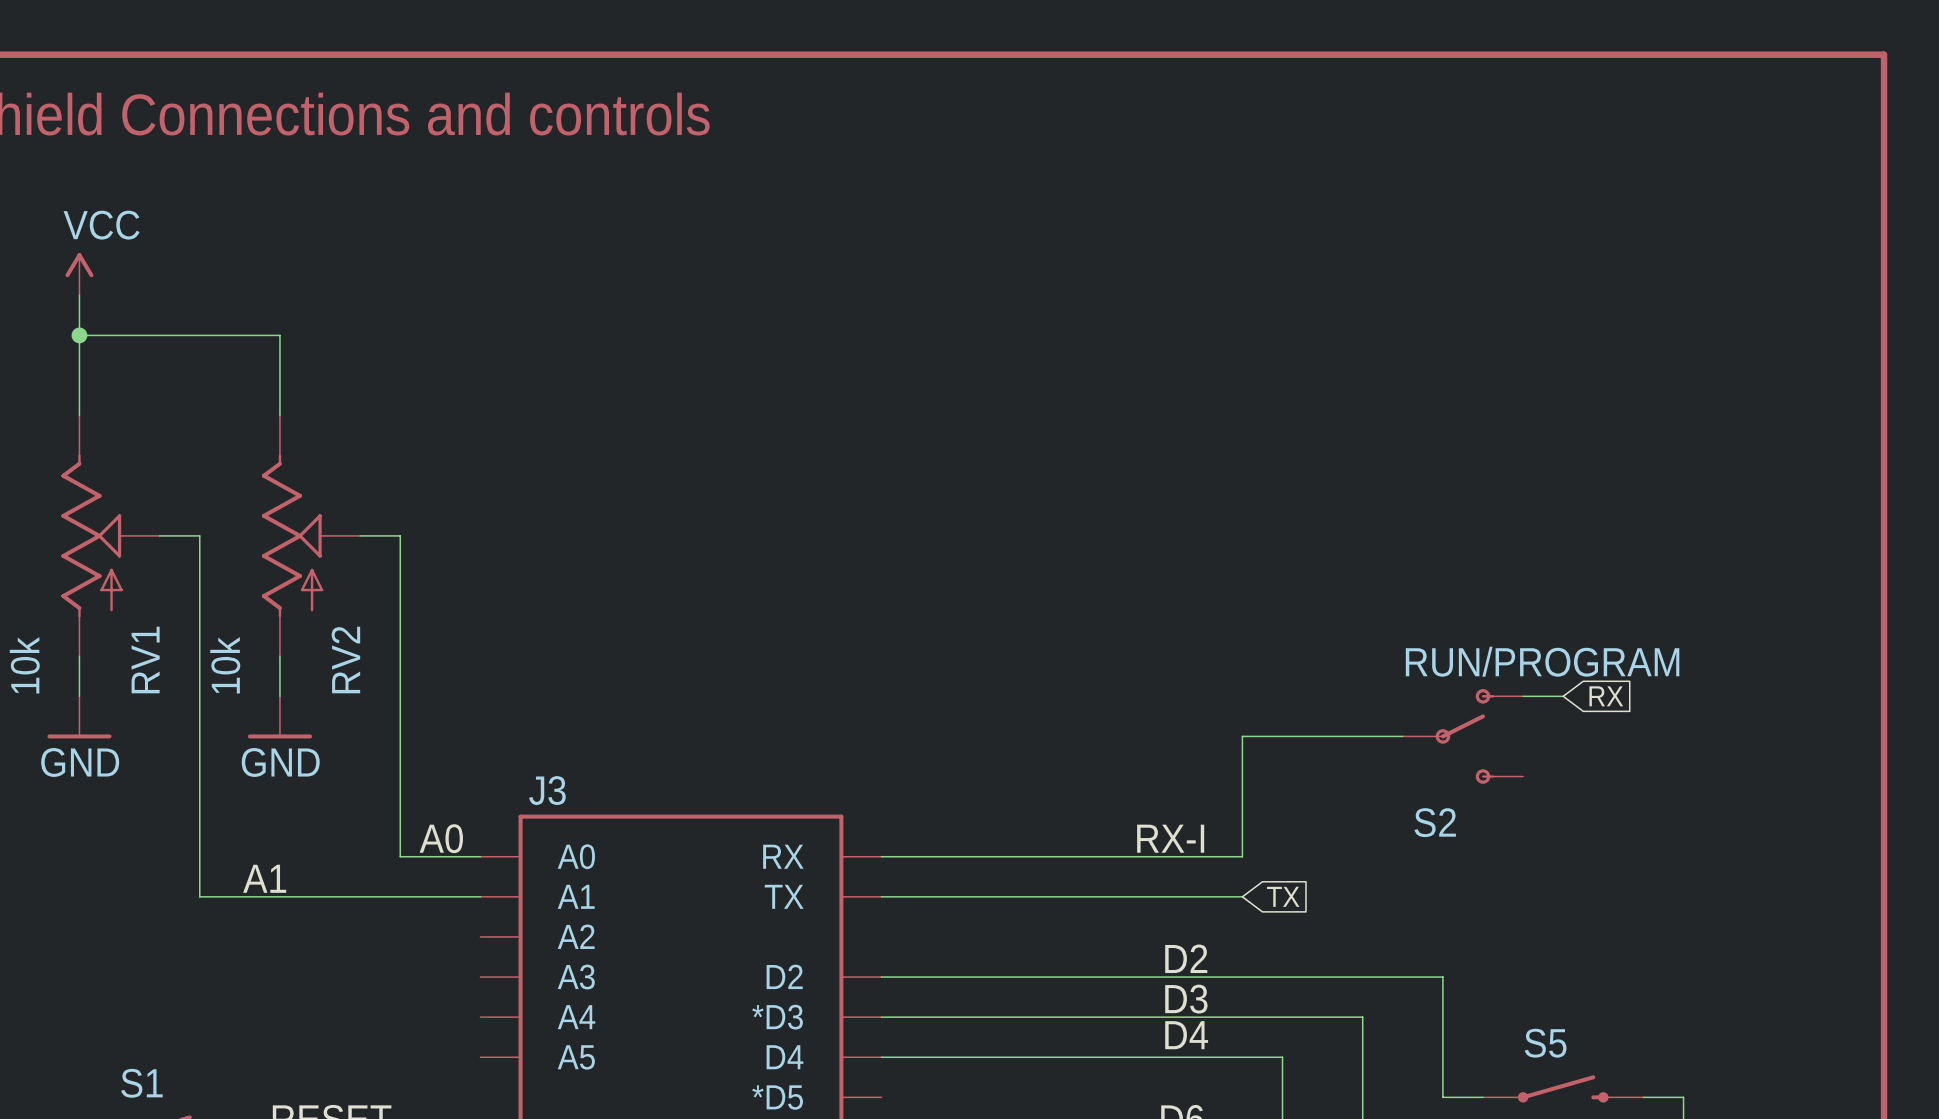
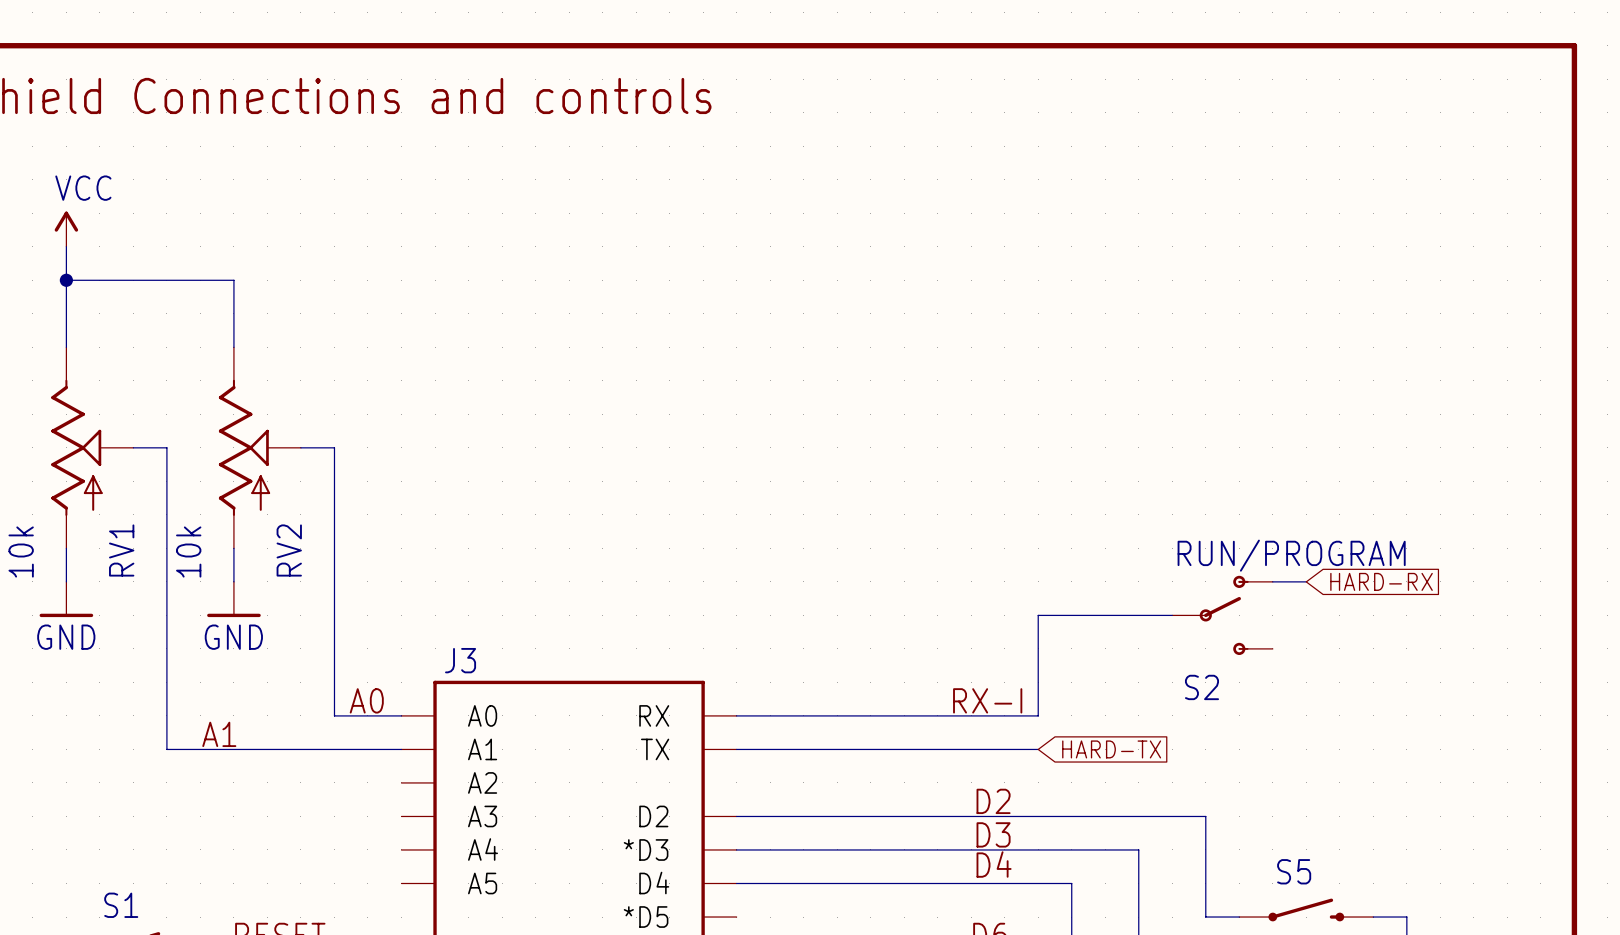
global label: RX (1606, 696) -> HARD-RX (1381, 581)
global label: TX (1283, 896) -> HARD-TX (1111, 749)

